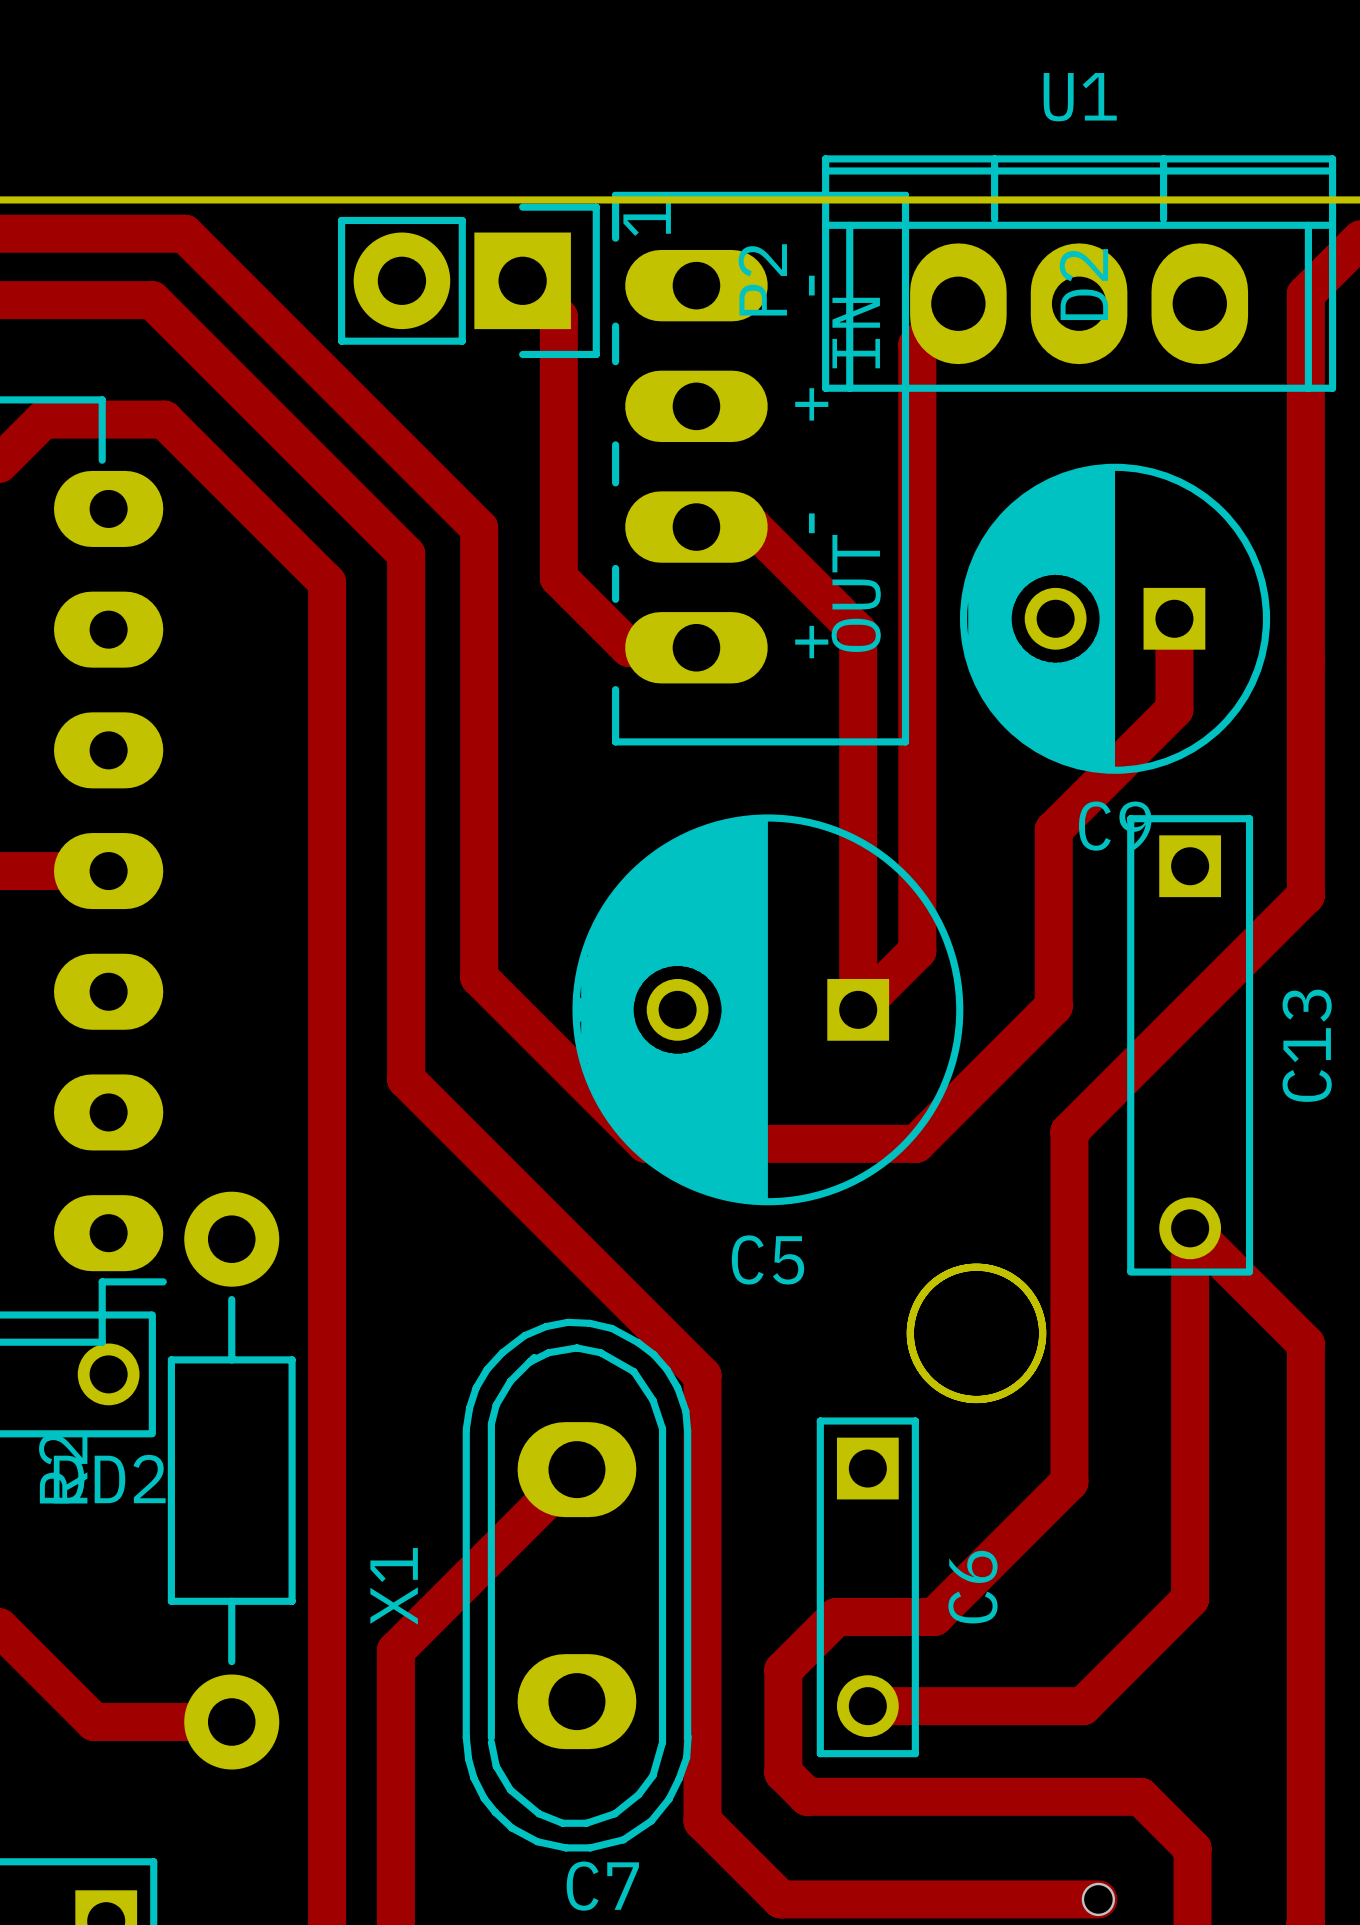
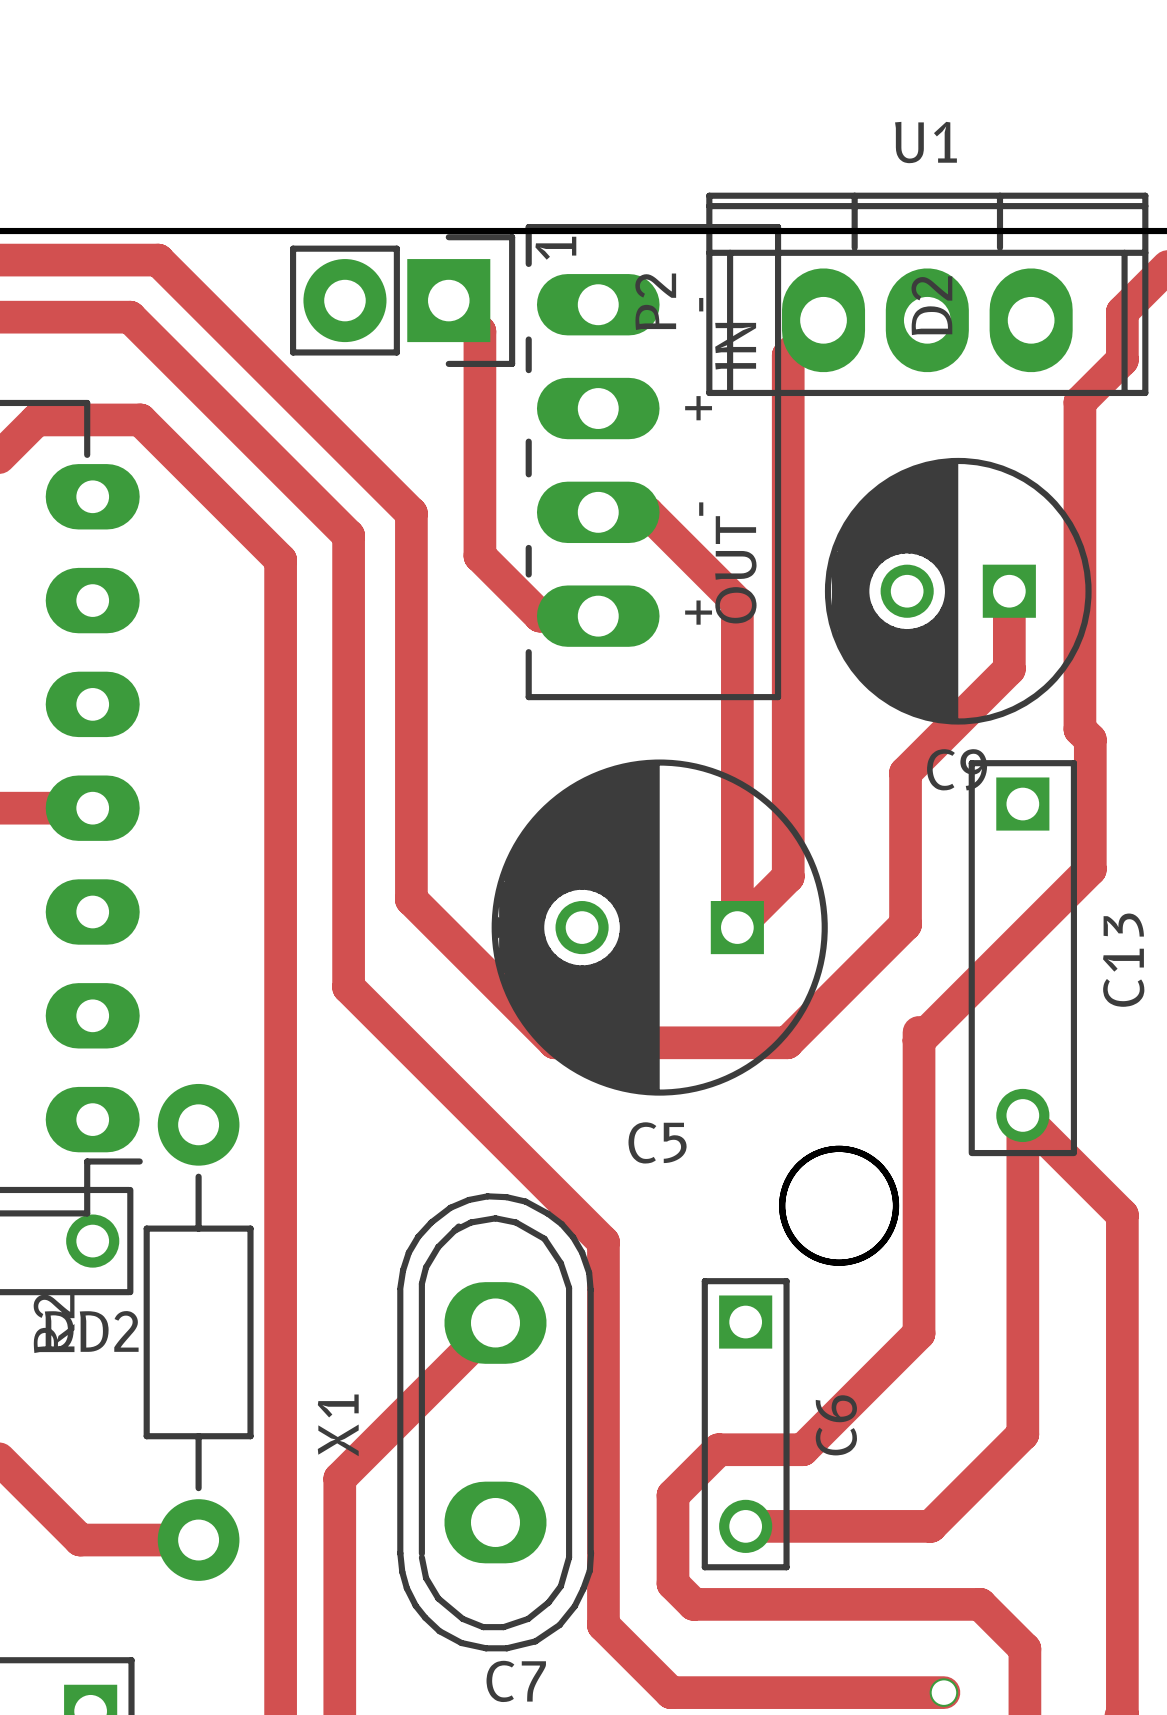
track: (1305, 349) (1305, 895) (1069, 1131) -> (1122, 359) (1079, 402) (1079, 729) (1090, 739) (1090, 869) (919, 1040)

